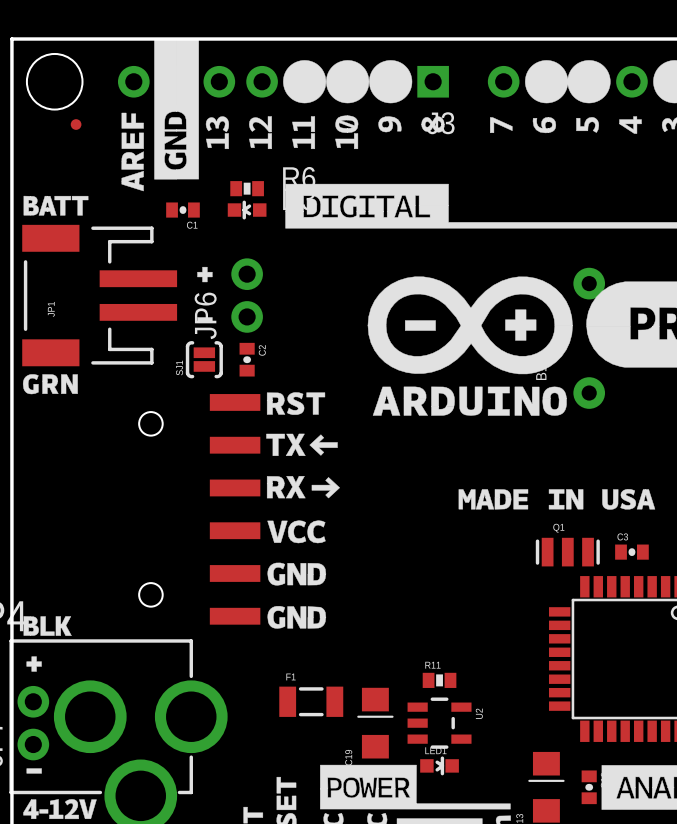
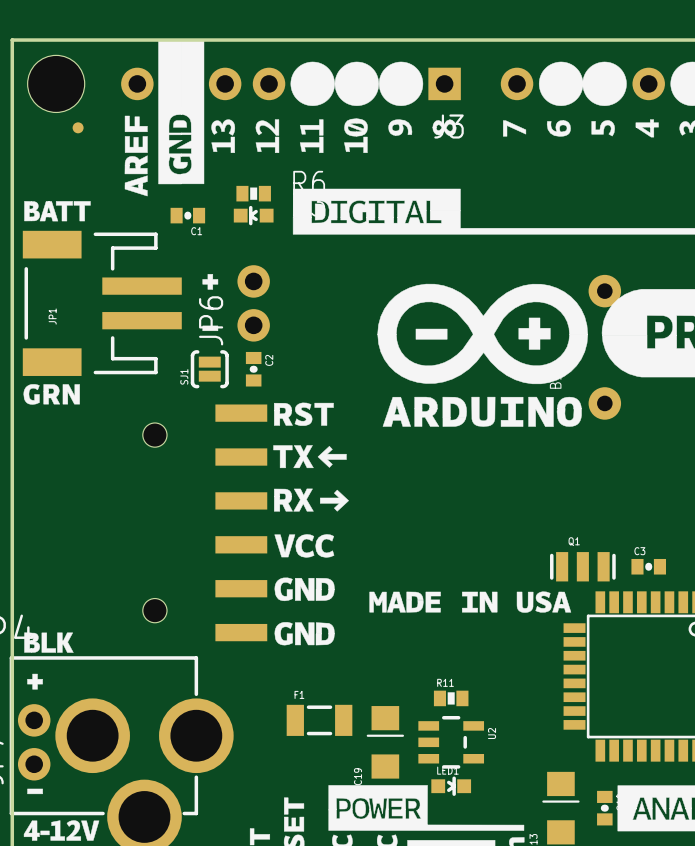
drawing position: (484, 493) -> (396, 595)
drawing position: (503, 493) -> (414, 595)
drawing position: (467, 499) -> (378, 602)
drawing position: (520, 499) -> (433, 602)
drawing position: (556, 499) -> (469, 602)
drawing position: (574, 499) -> (488, 602)
drawing position: (610, 499) -> (525, 602)
drawing position: (628, 499) -> (543, 602)
drawing position: (641, 499) -> (557, 602)
drawing position: (650, 499) -> (566, 602)
drawing position: (484, 503) -> (396, 606)
drawing position: (503, 503) -> (415, 606)

